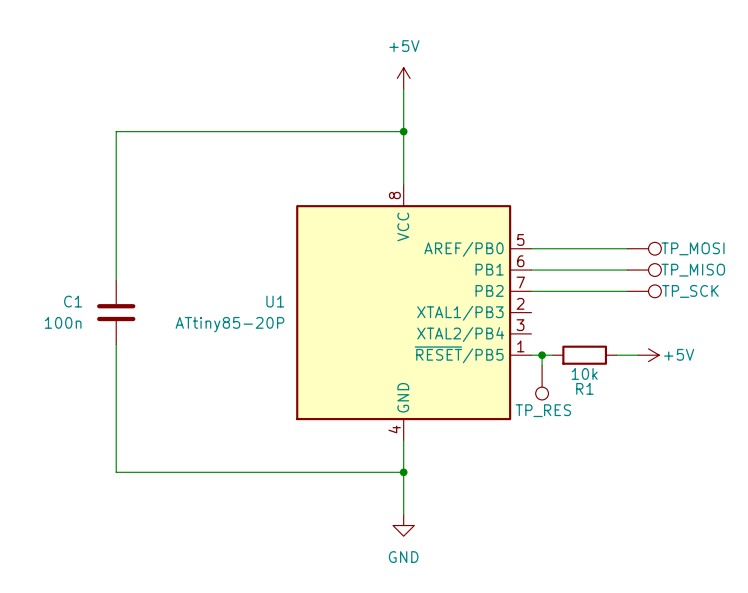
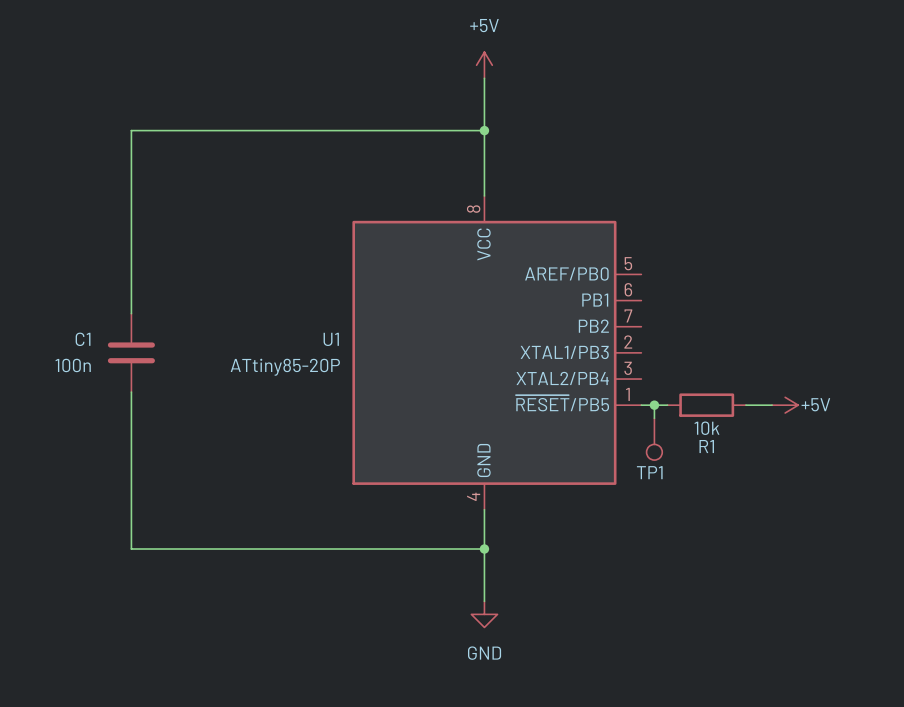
wire: (531, 248) (627, 248) -> none
TP_MOSI: (644, 248) -> none
wire: (531, 270) (627, 270) -> none
TP_MISO: (644, 270) -> none
wire: (531, 291) (627, 291) -> none
TP_SCK: (644, 291) -> none
TP_RES name: TP_RES (543, 410) -> TP1 (649, 472)

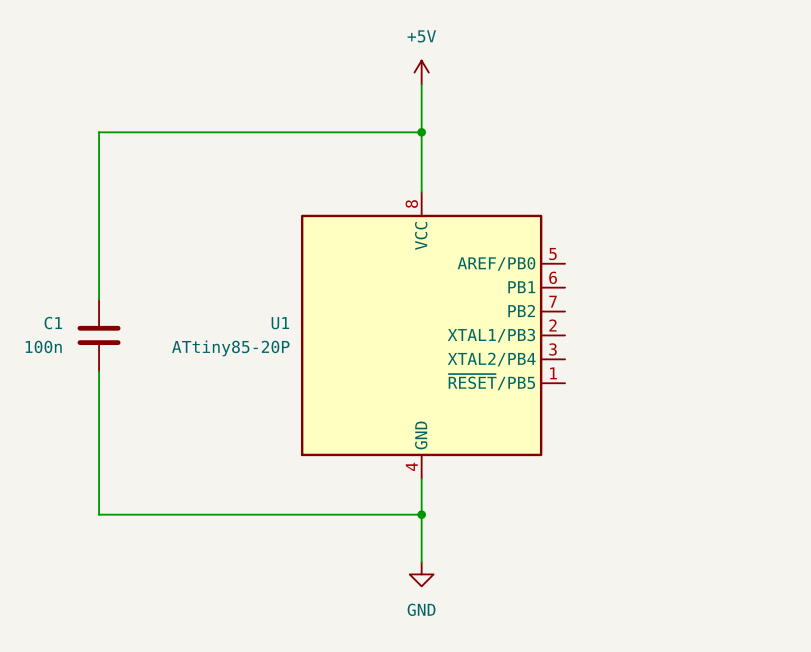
wire: (641, 405) (667, 405) -> none
wire: (654, 405) (654, 418) -> none
junction: (654, 405) -> none
R1: 10k (706, 405) -> none
wire: (745, 405) (772, 405) -> none
power symbol: +5V (785, 405) -> none
TP1: (654, 439) -> none

